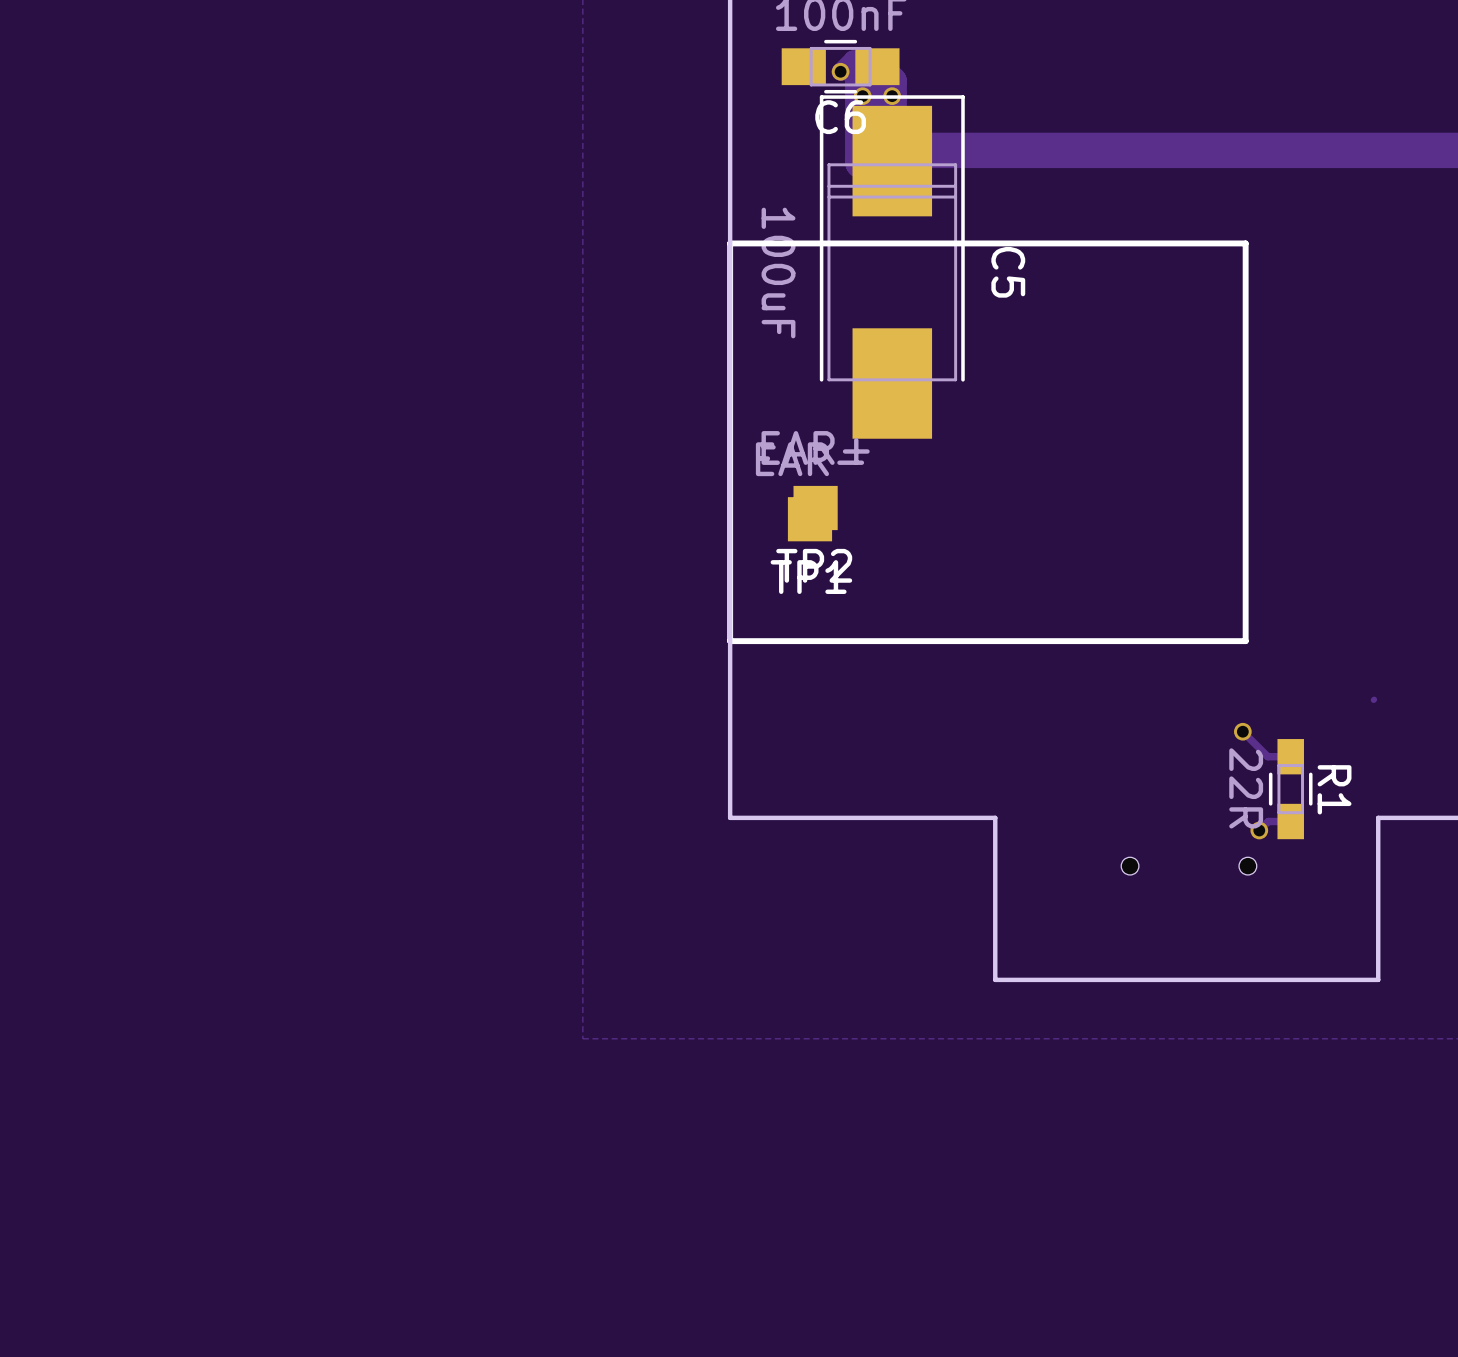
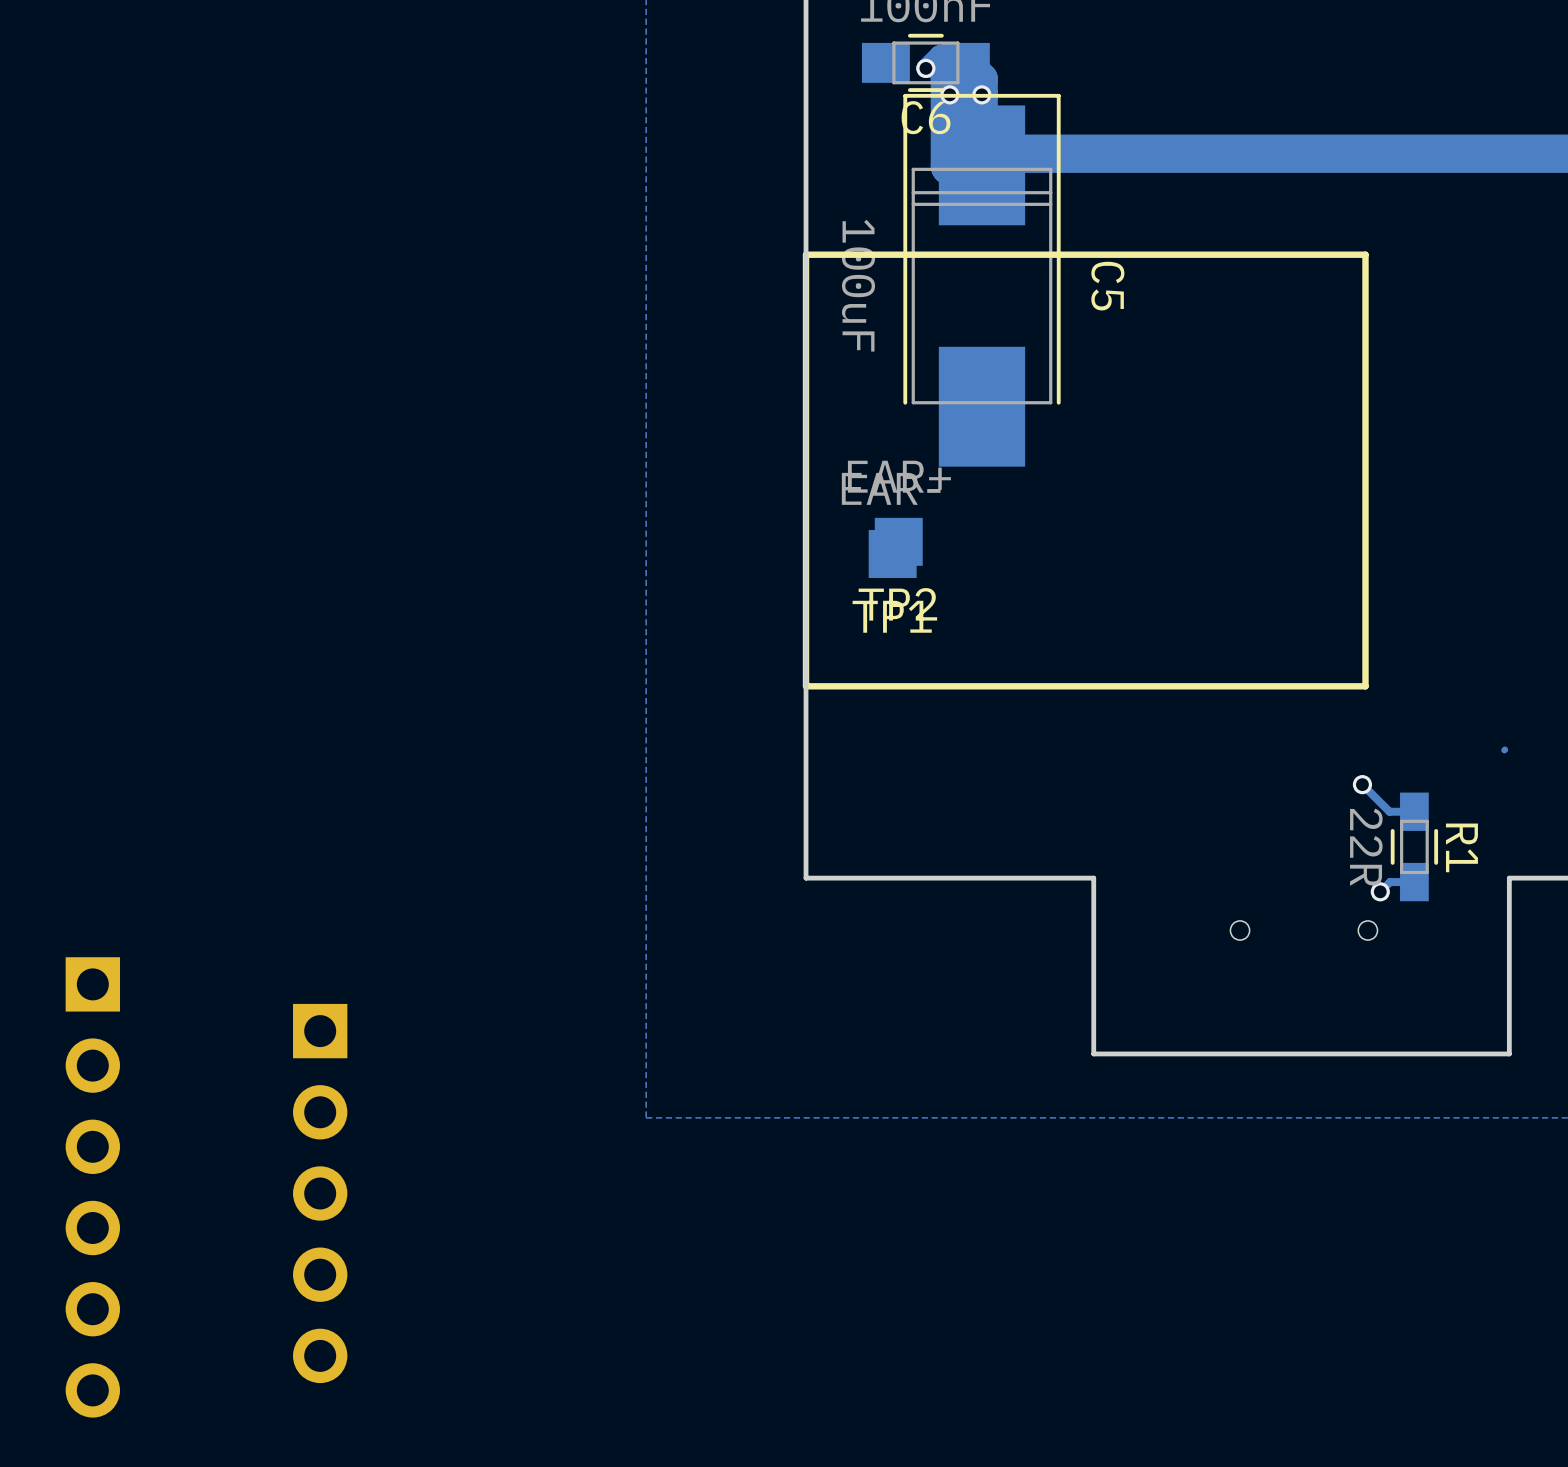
part: none -> (92, 1187)
part: none -> (320, 1193)

